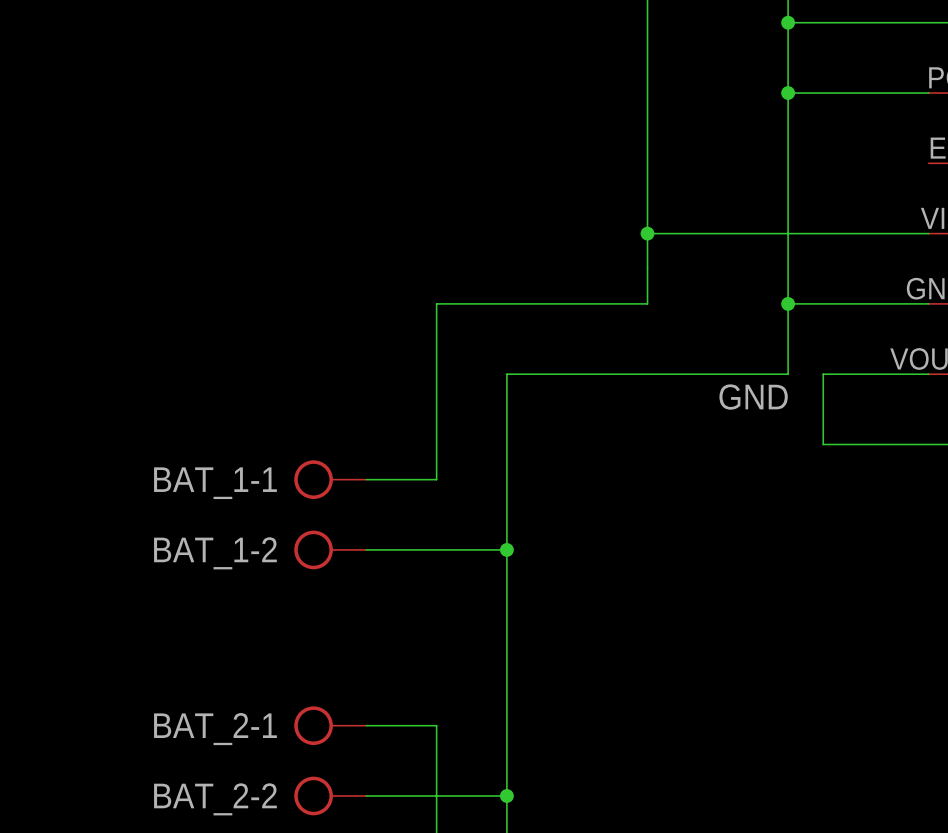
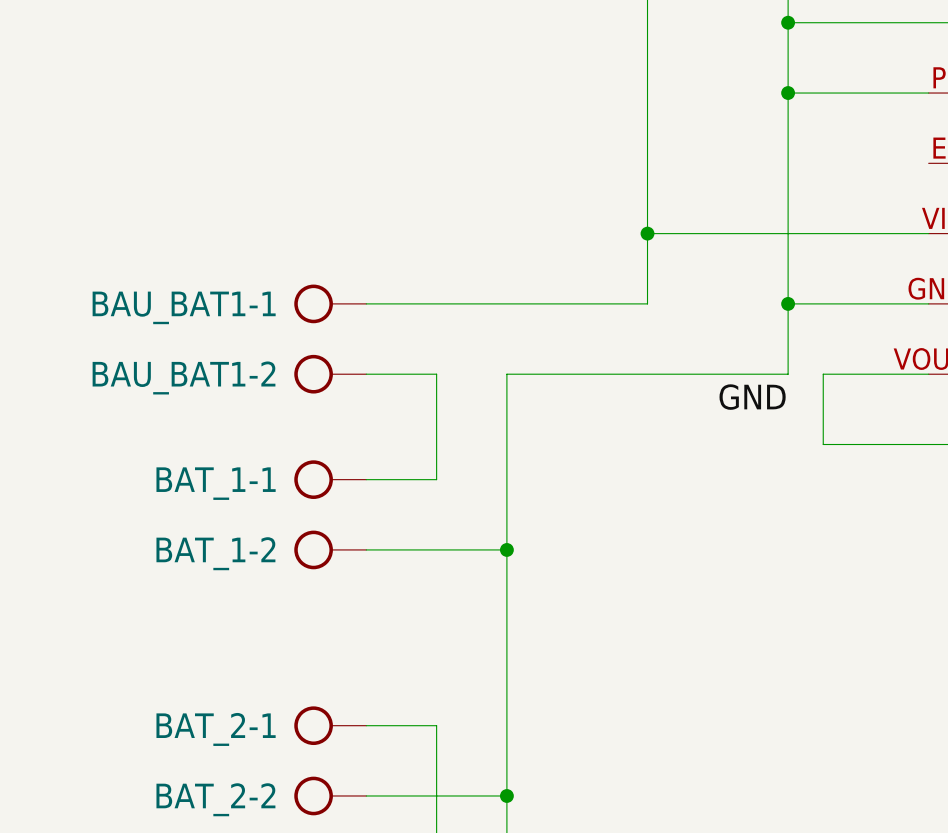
BAU_BAT1-1: none -> (330, 303)
wire: (436, 303) (436, 374) -> (436, 303) (366, 303)
BAU_BAT1-2: none -> (330, 374)
wire: none -> (366, 374) (436, 374)

